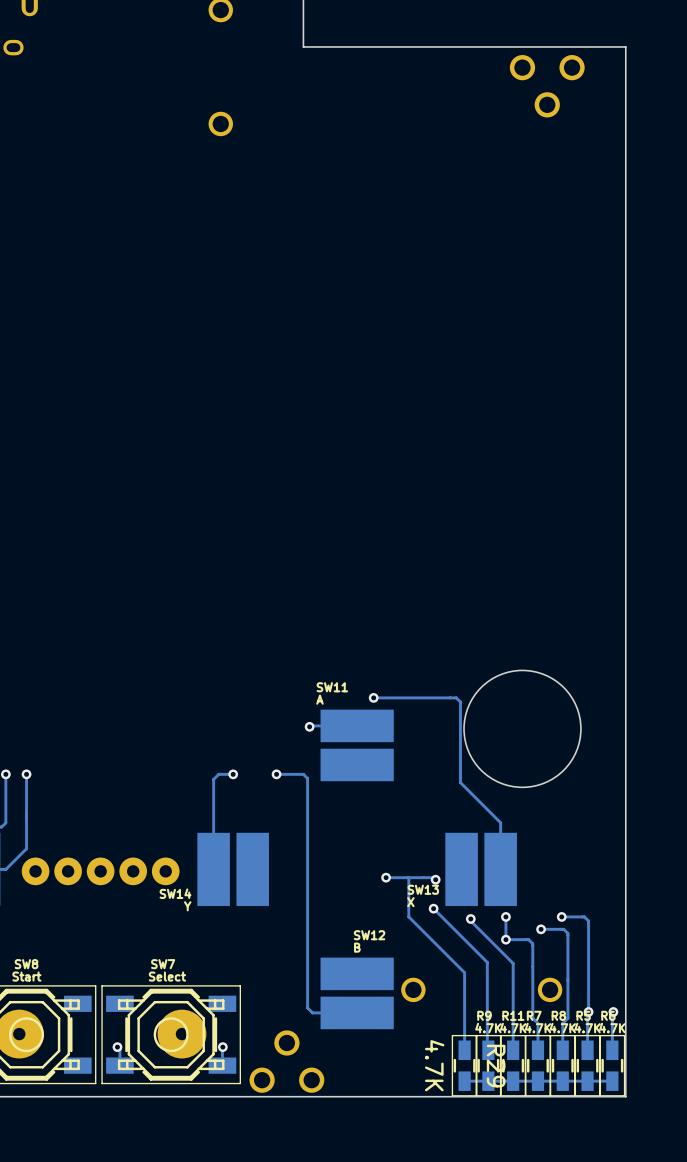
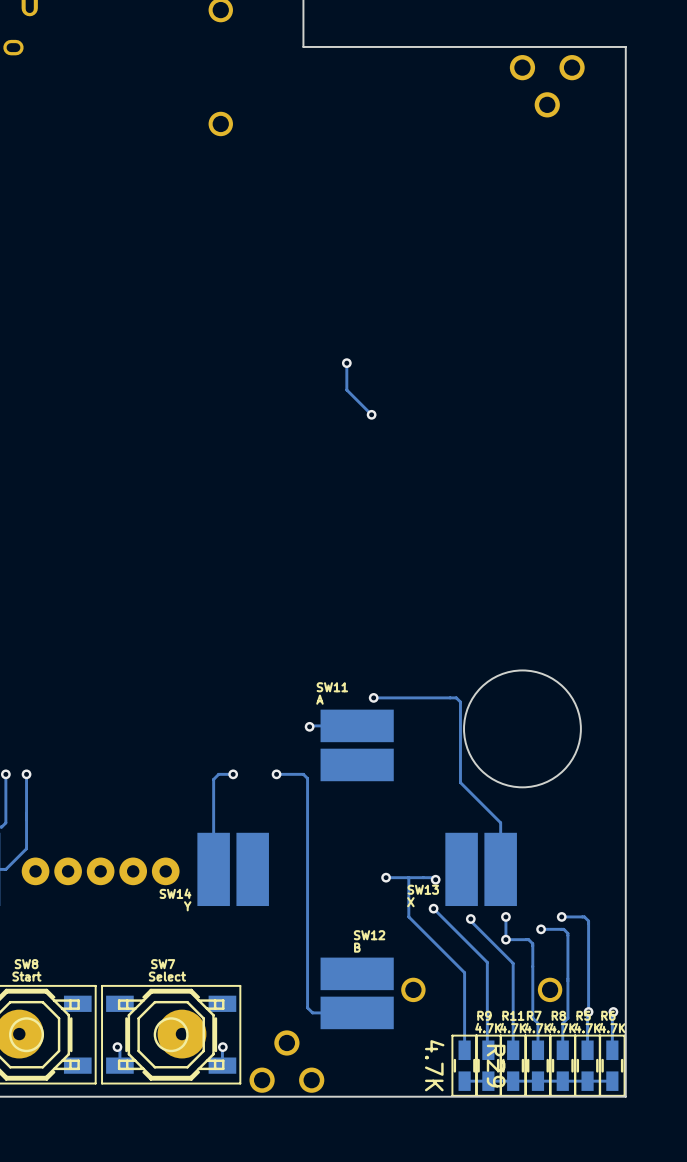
track: none -> (346, 363) (346, 390) (371, 414)
via: none -> (346, 363)
via: none -> (371, 414)

